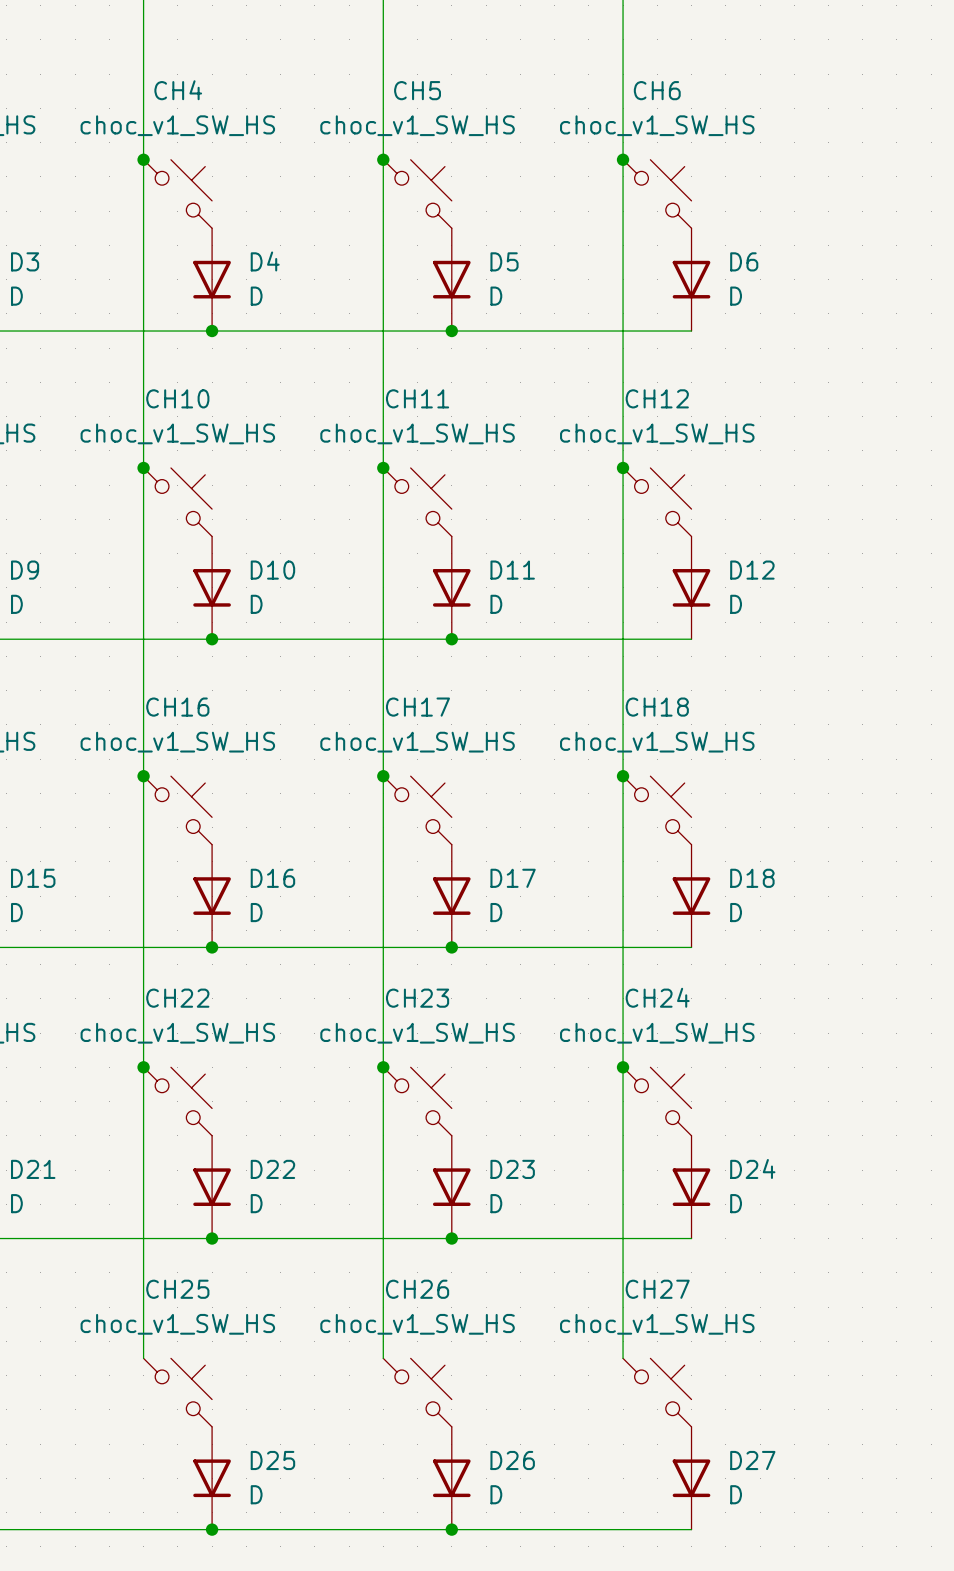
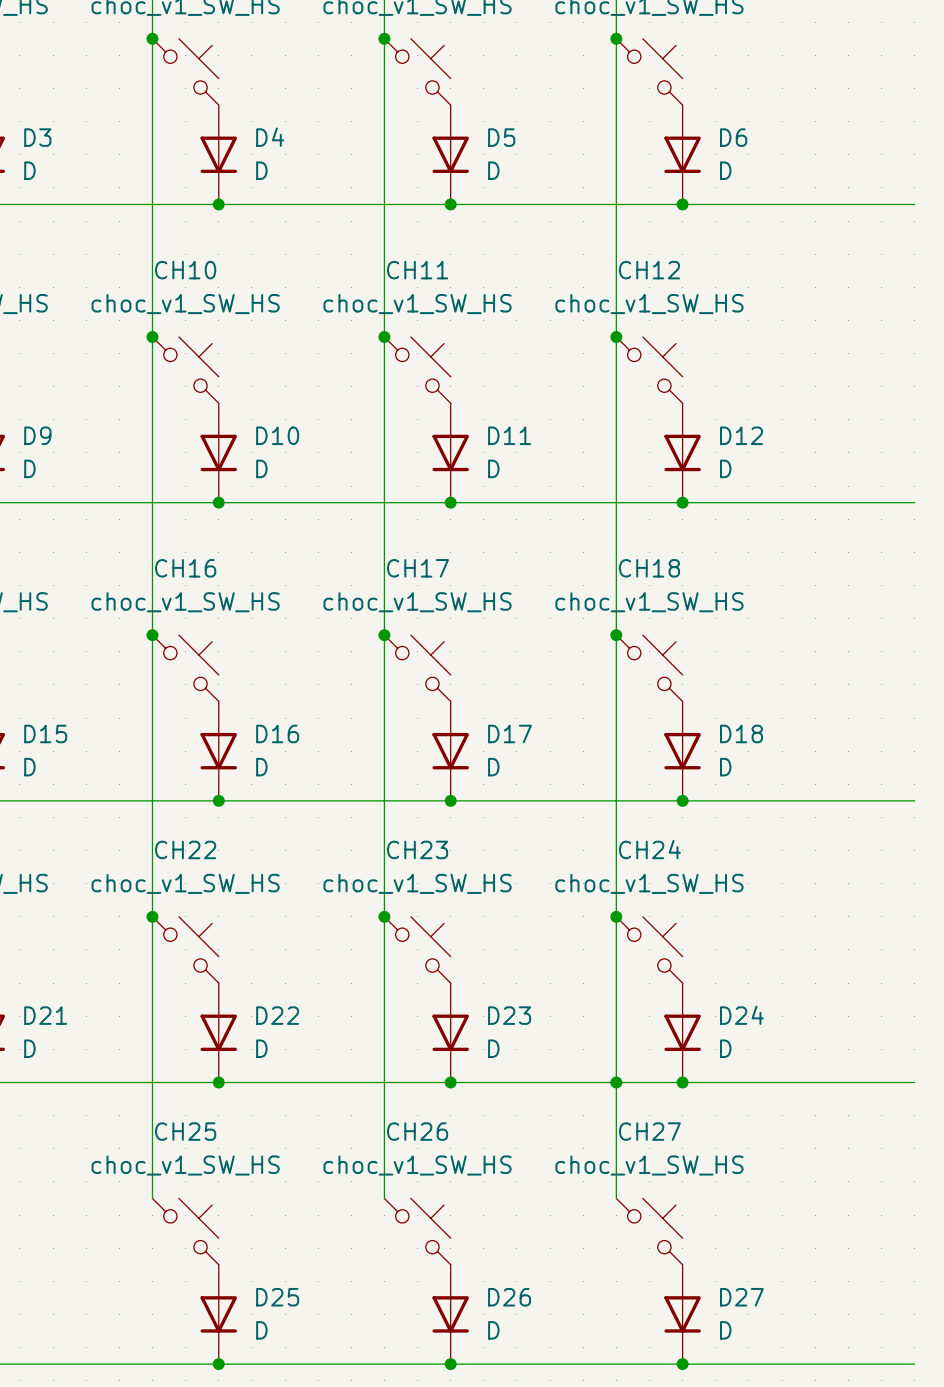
wire: none -> (682, 204) (914, 204)
junction: none -> (682, 204)
wire: none -> (682, 502) (914, 502)
junction: none -> (682, 502)
wire: none -> (682, 800) (914, 800)
junction: none -> (682, 800)
junction: none -> (616, 1082)
wire: none -> (682, 1082) (914, 1082)
junction: none -> (682, 1082)
wire: none -> (682, 1364) (914, 1364)
junction: none -> (682, 1364)

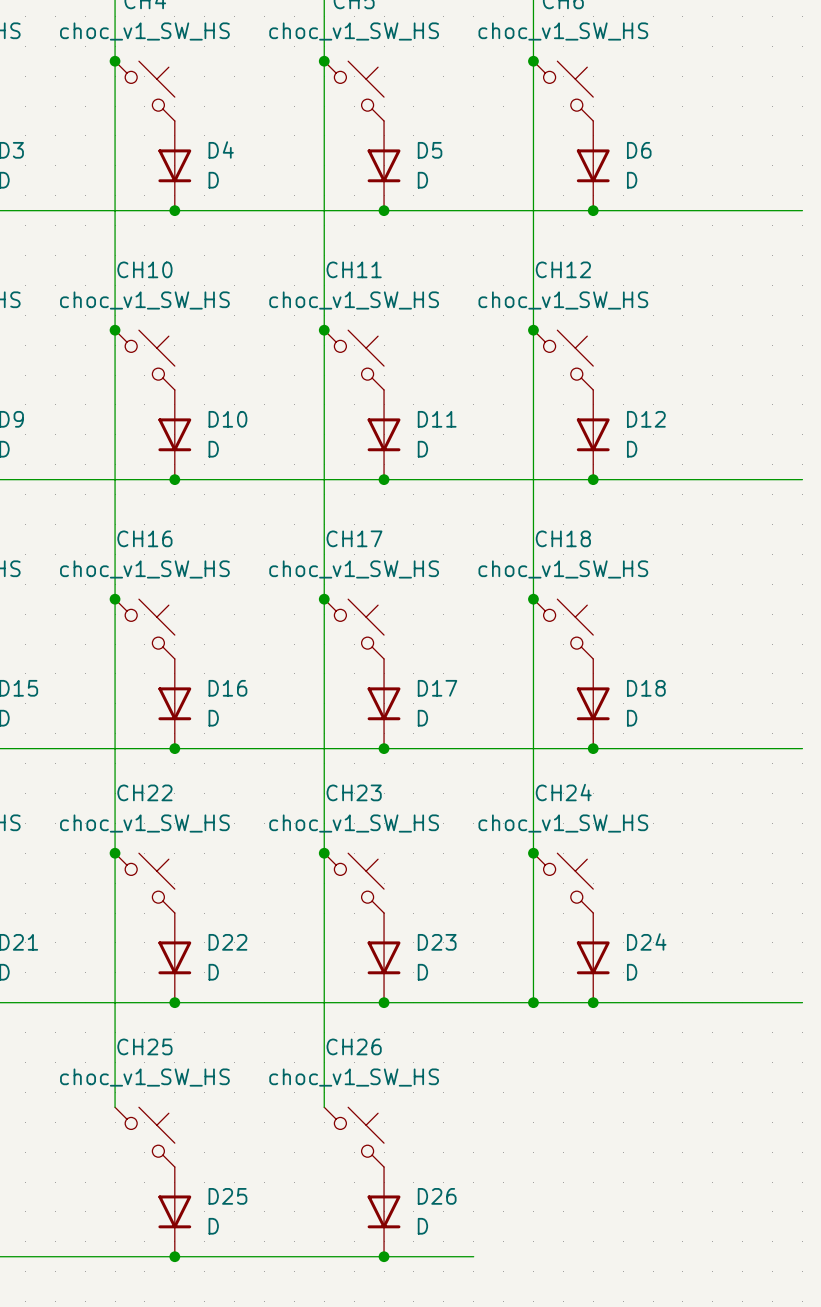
wire: (616, 1082) (616, 1198) -> none
CH27: choc_v1_SW_HS (649, 1231) -> none
D27: D (682, 1314) -> none
wire: (550, 1364) (914, 1364) -> none
junction: (682, 1364) -> none

